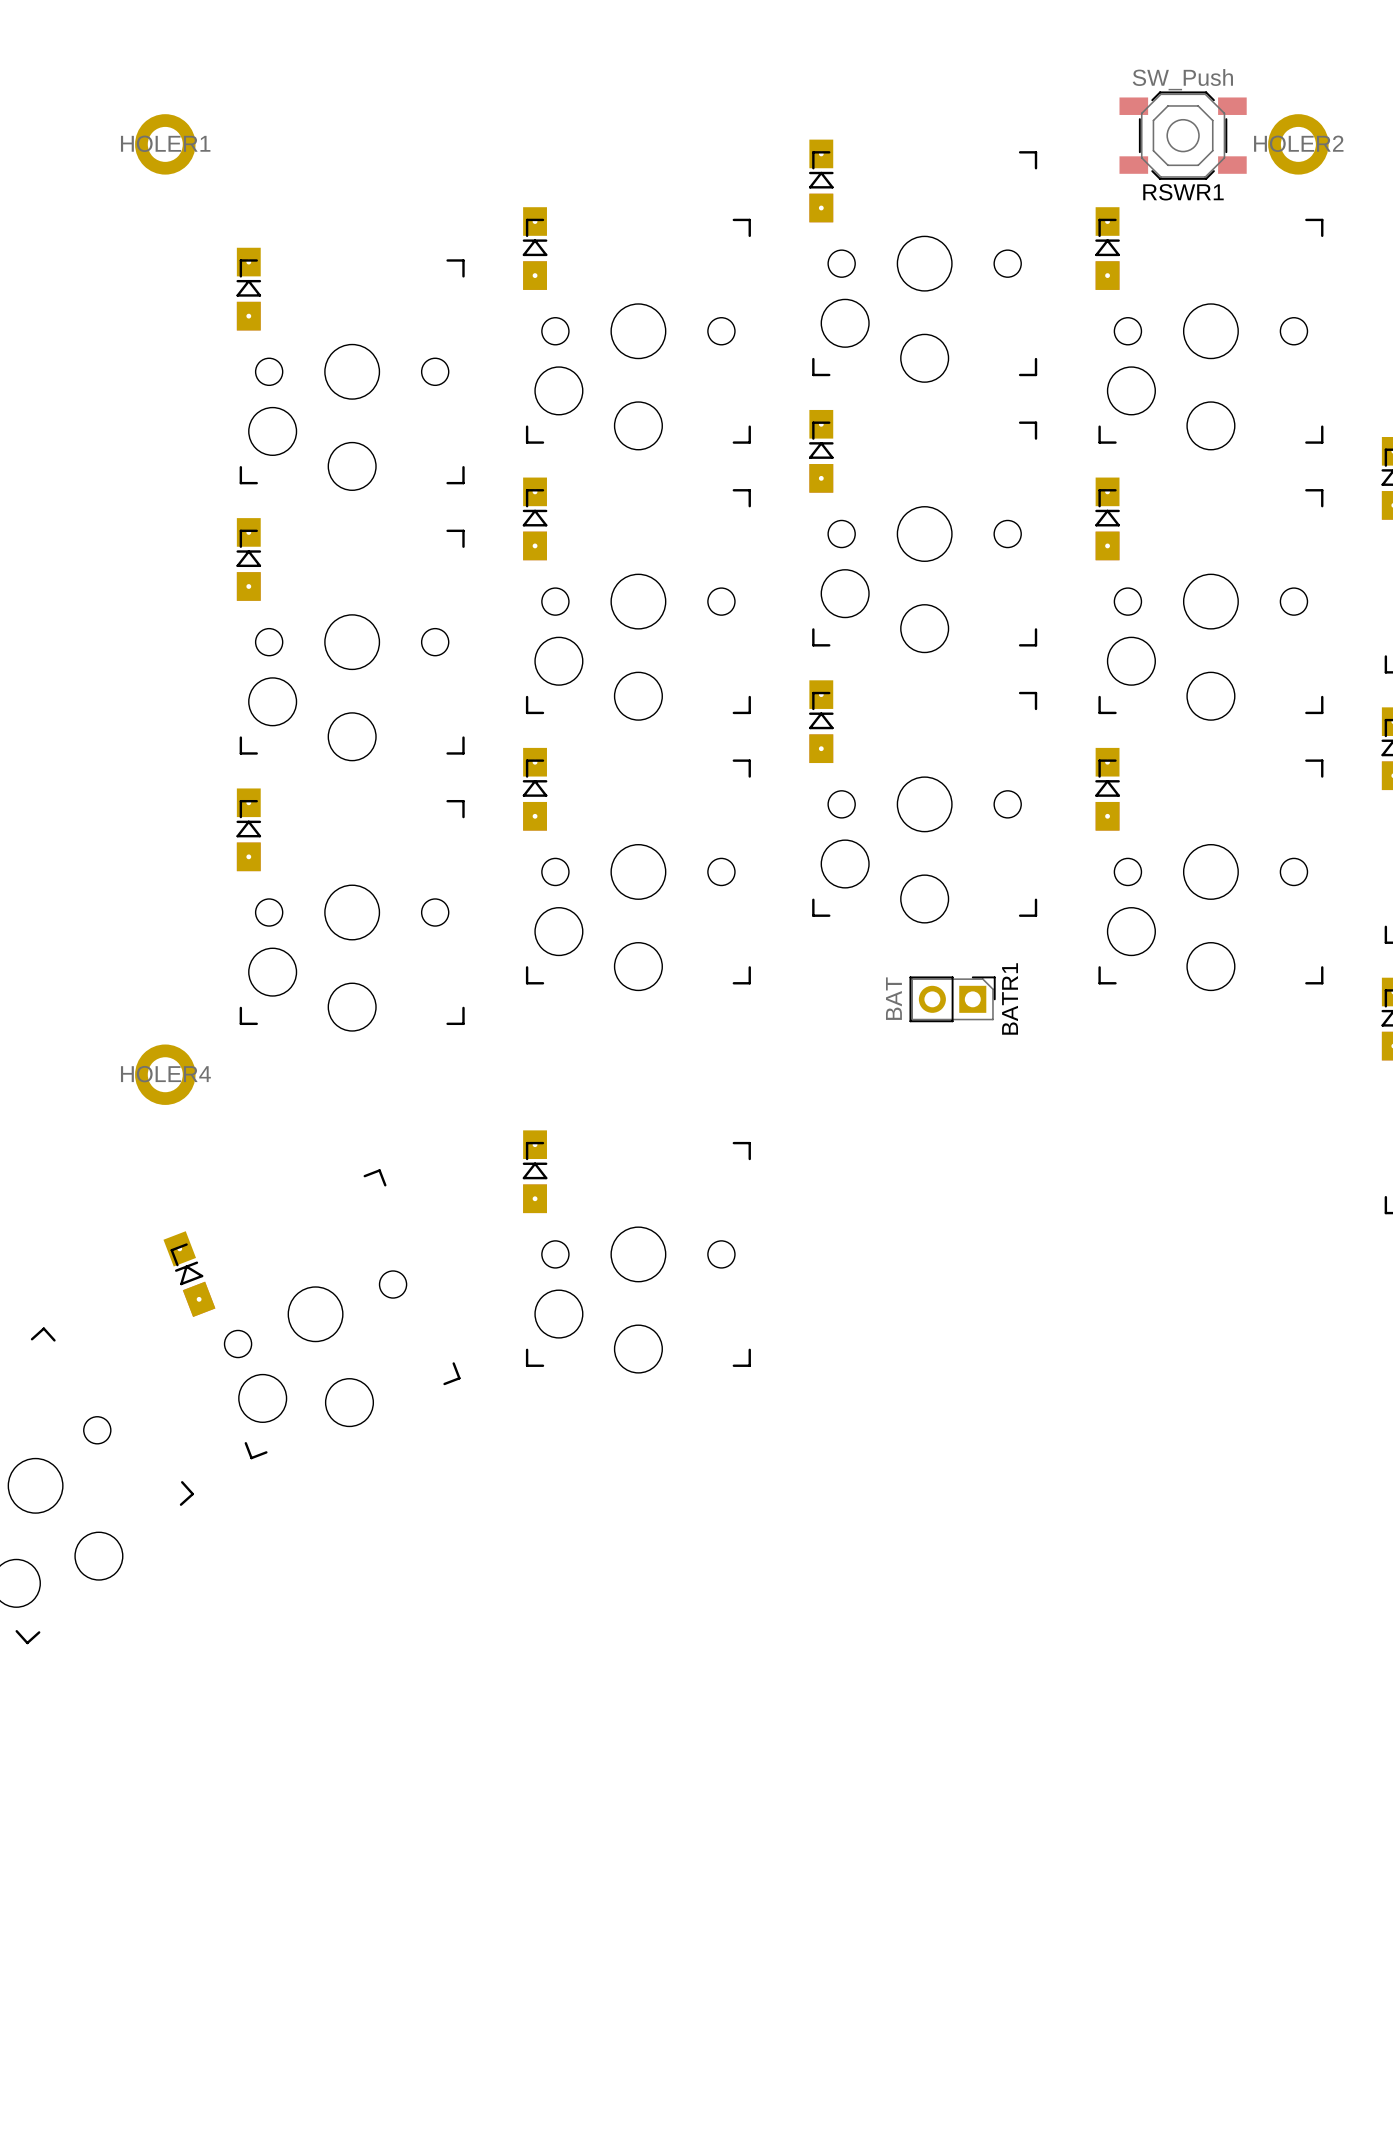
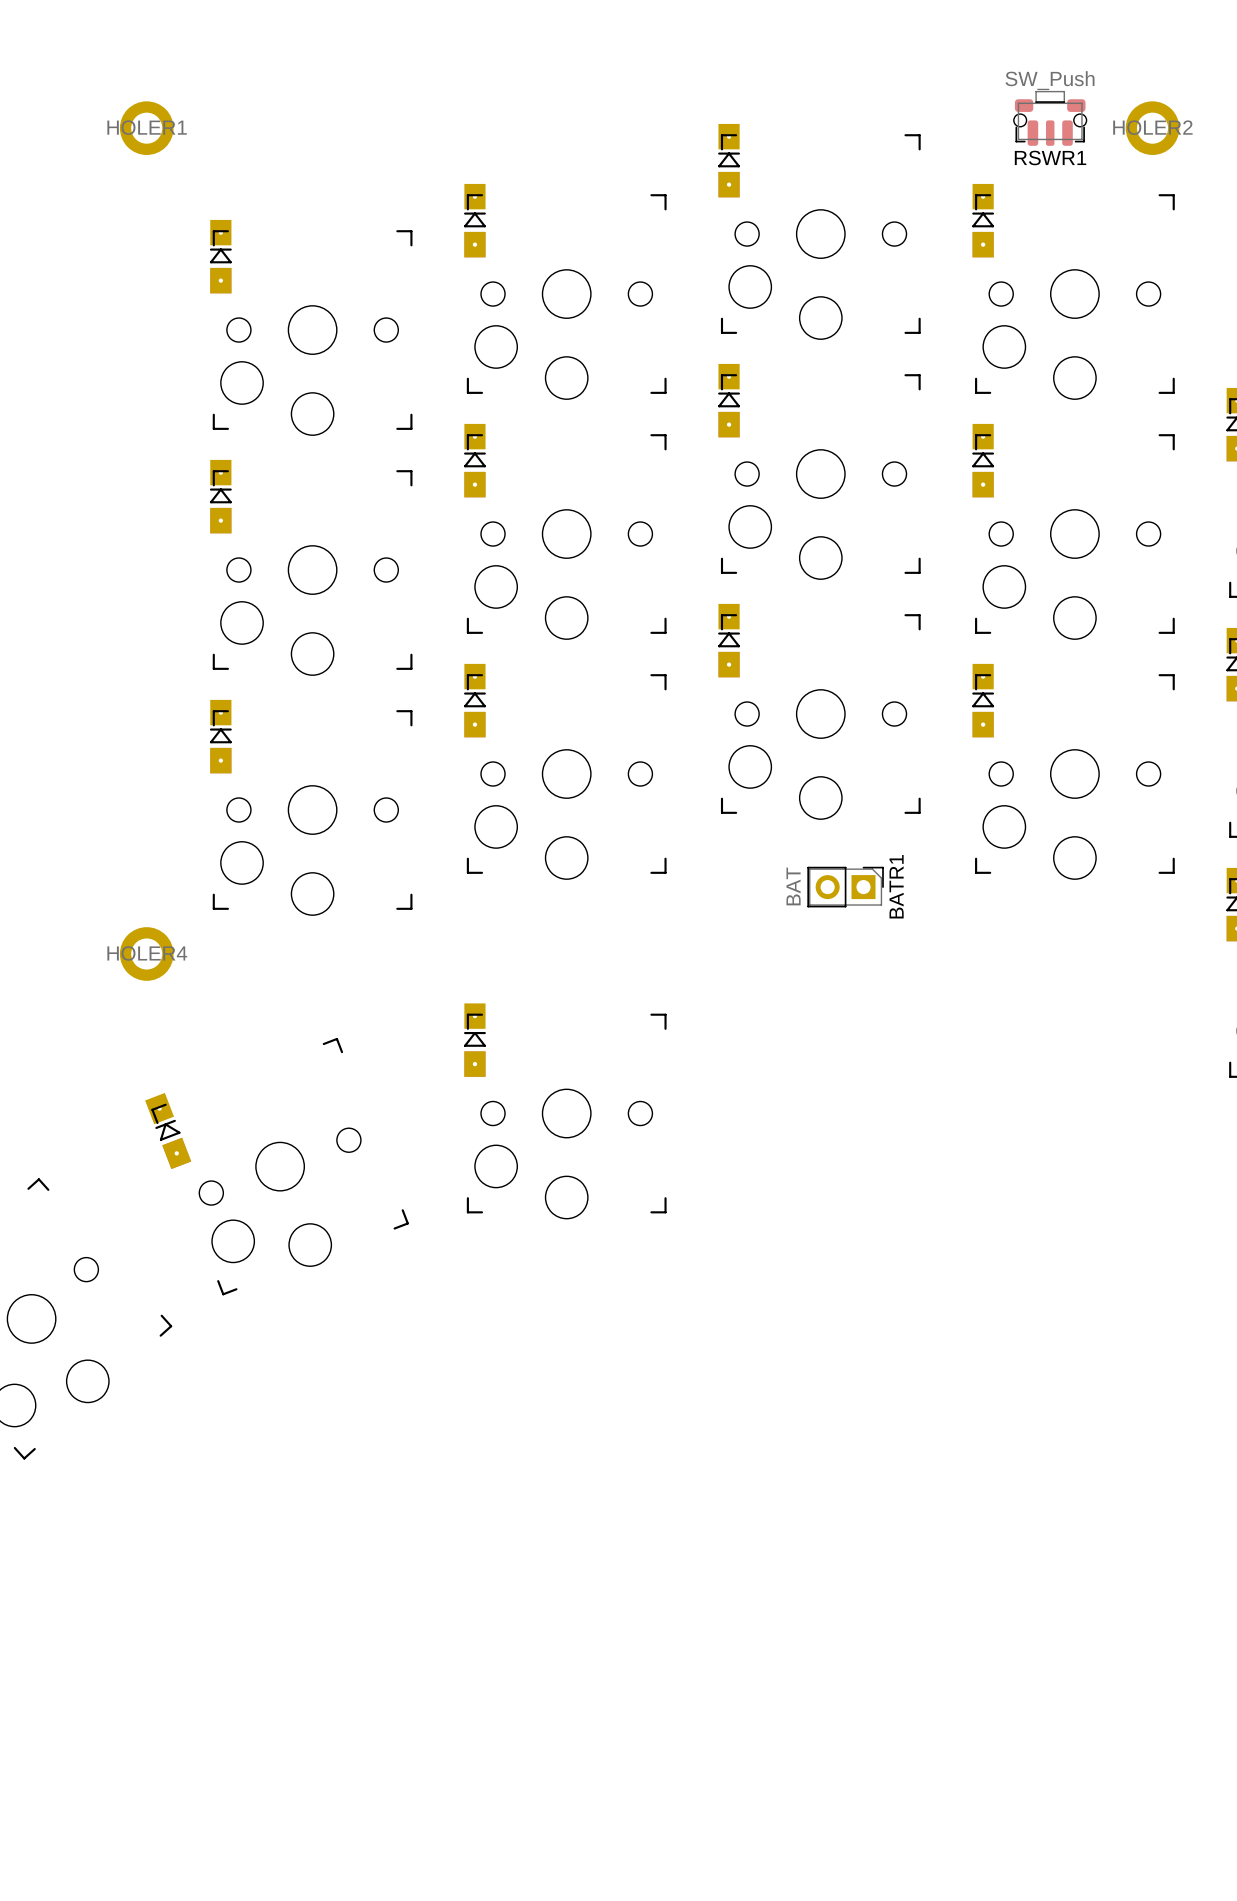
RSWR1 footprint: [1119, 91, 1247, 180] -> [1013, 90, 1087, 146]

